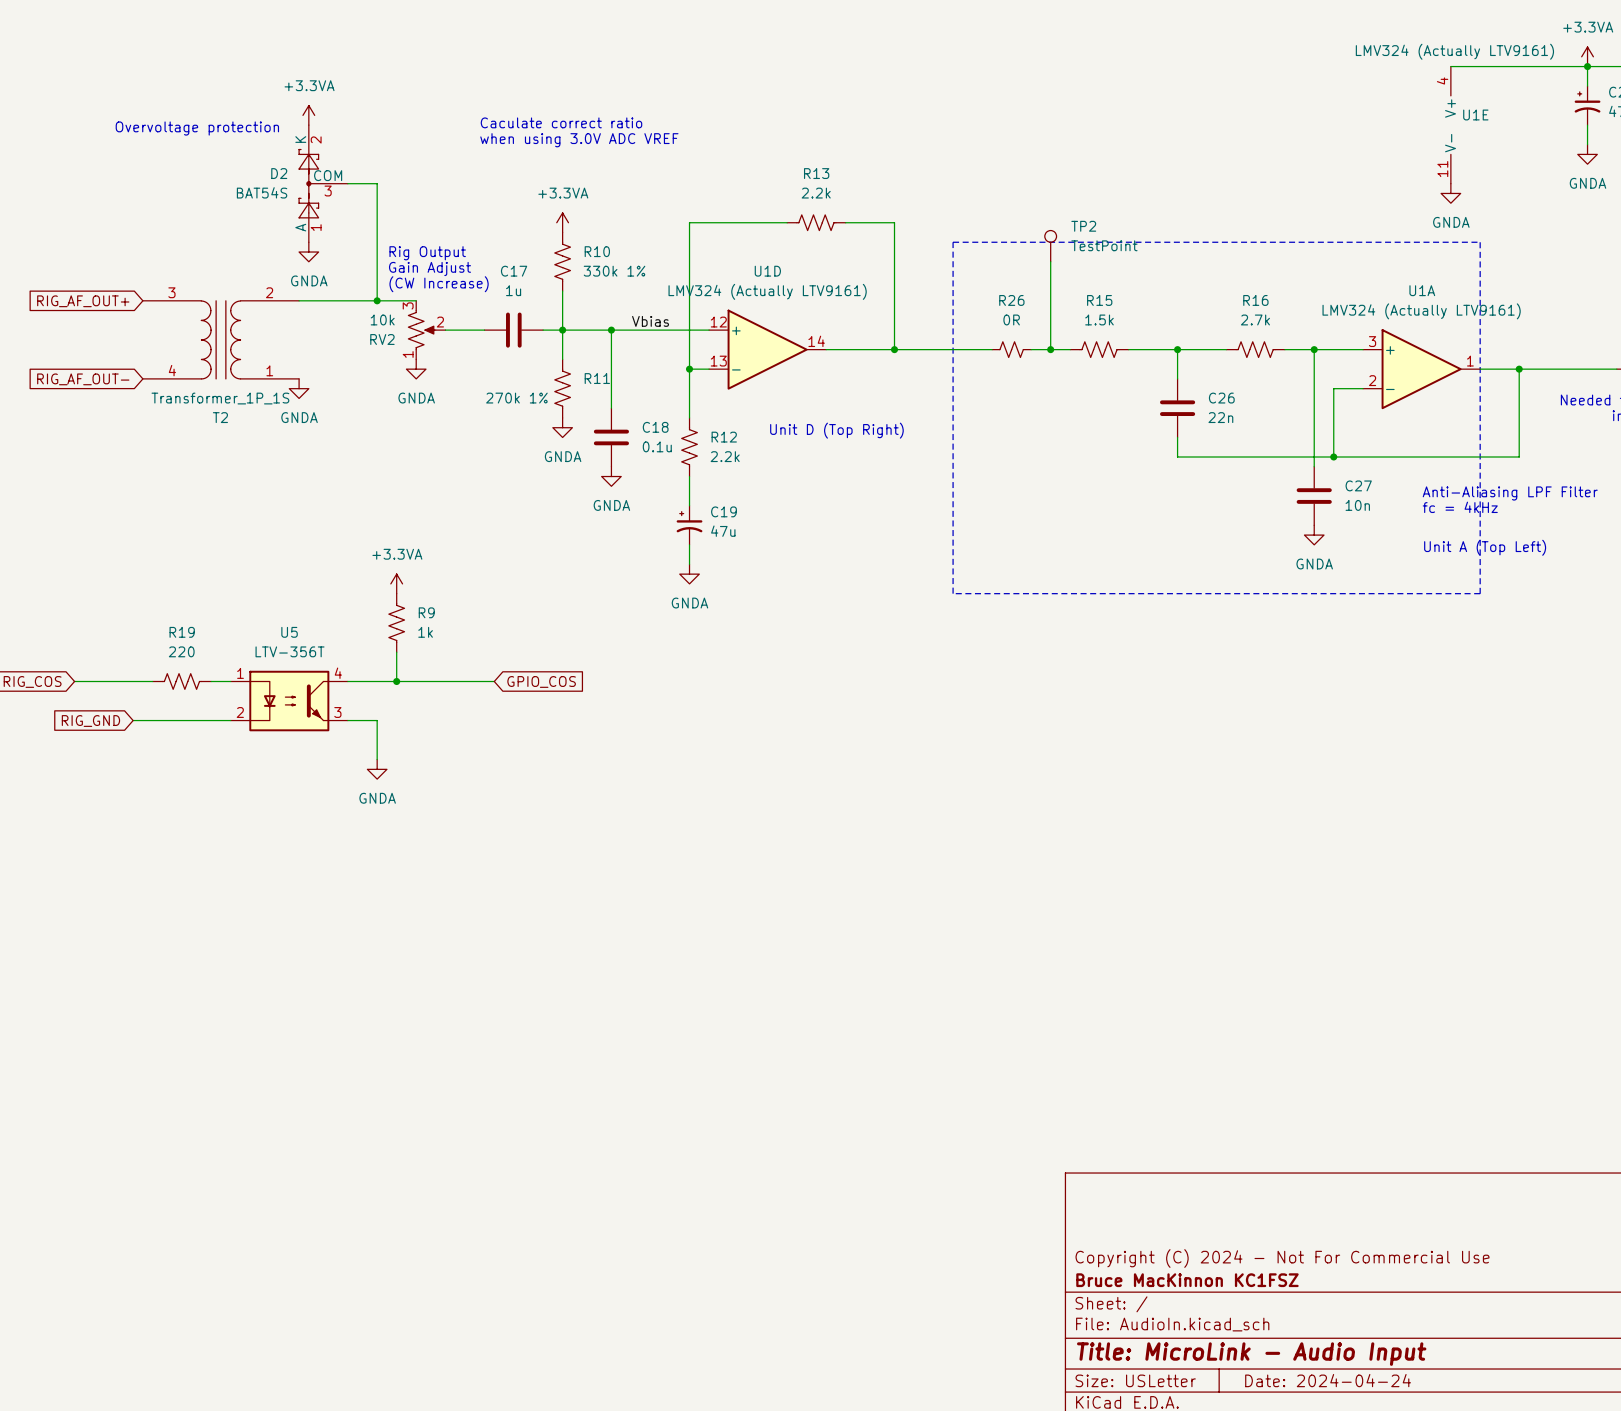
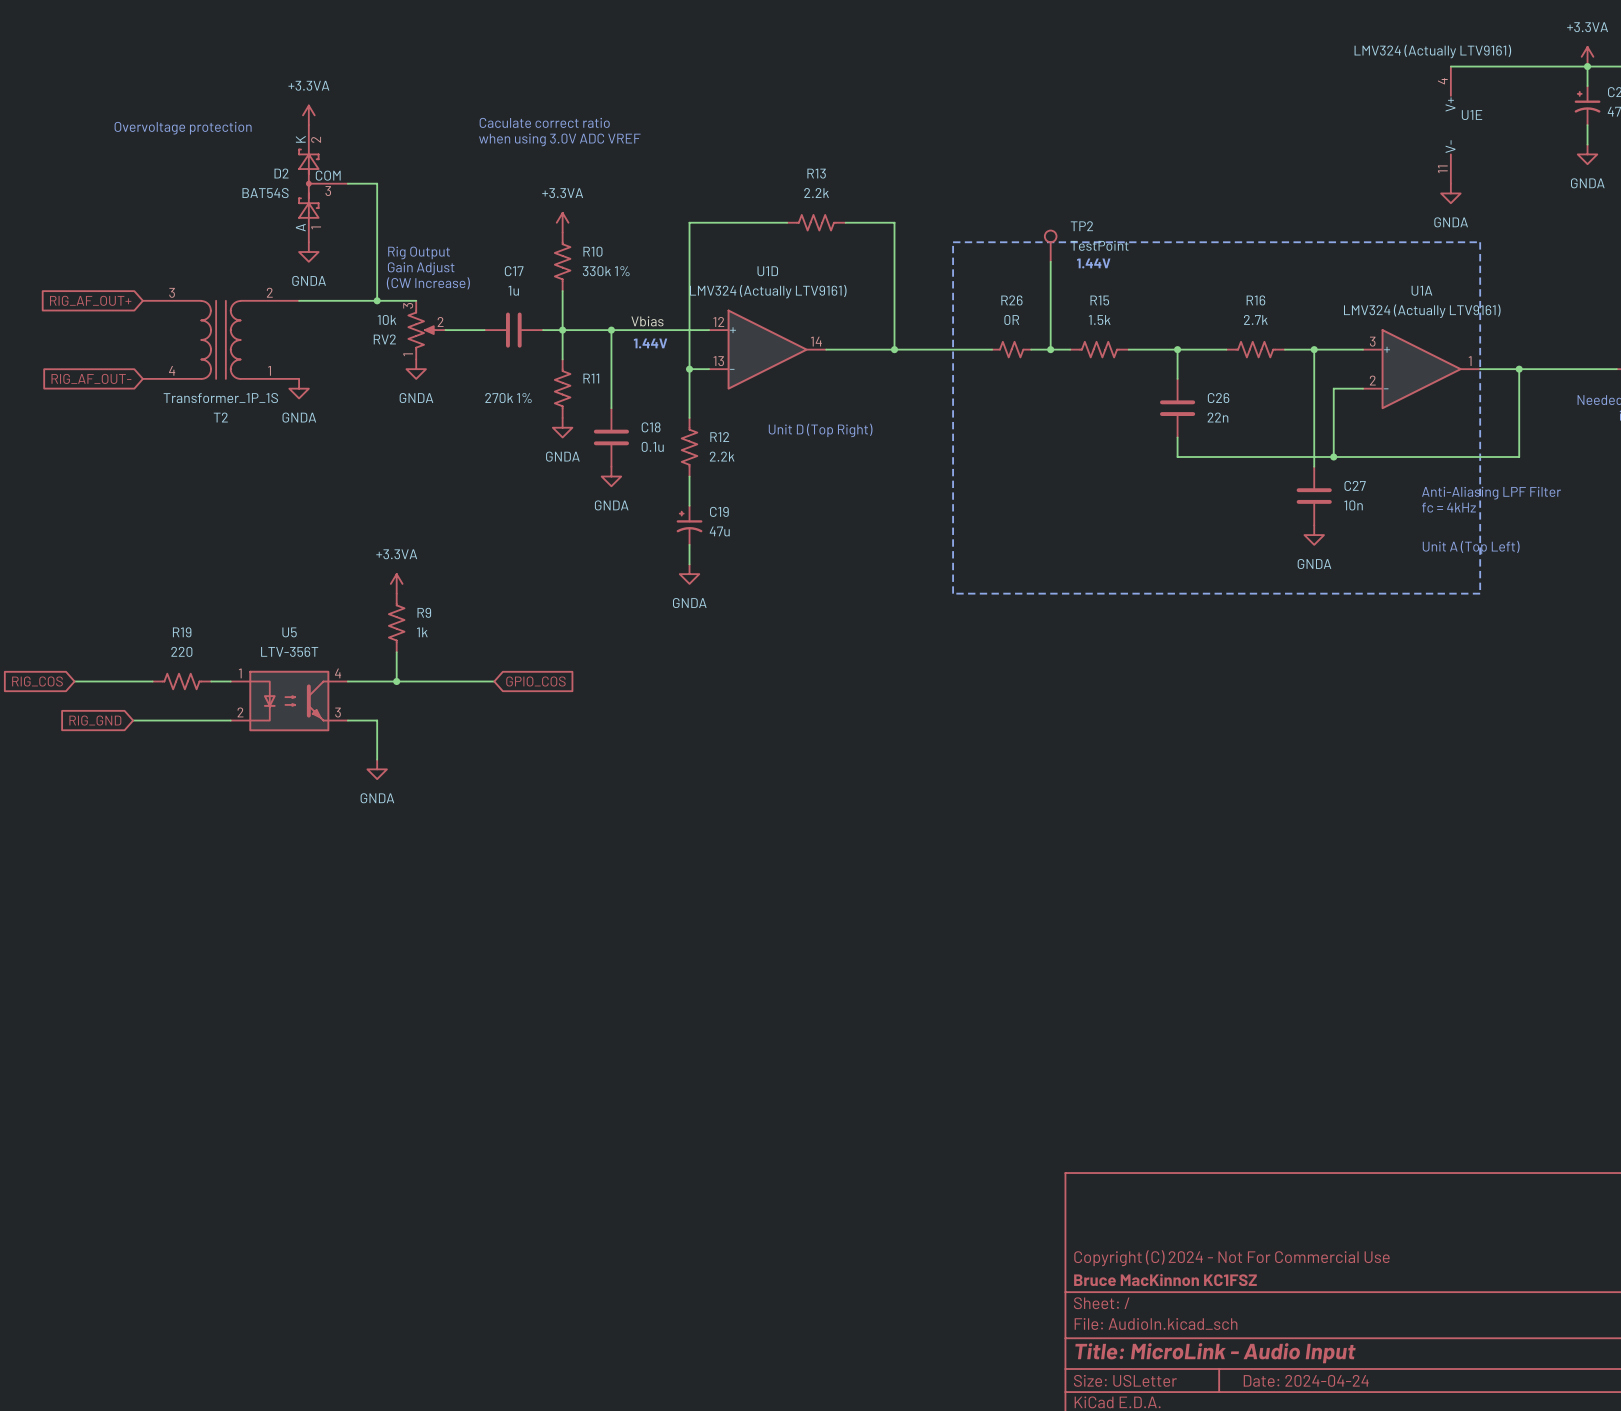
text: none -> 1.44V (1093, 263)
text: none -> 1.44V (650, 343)

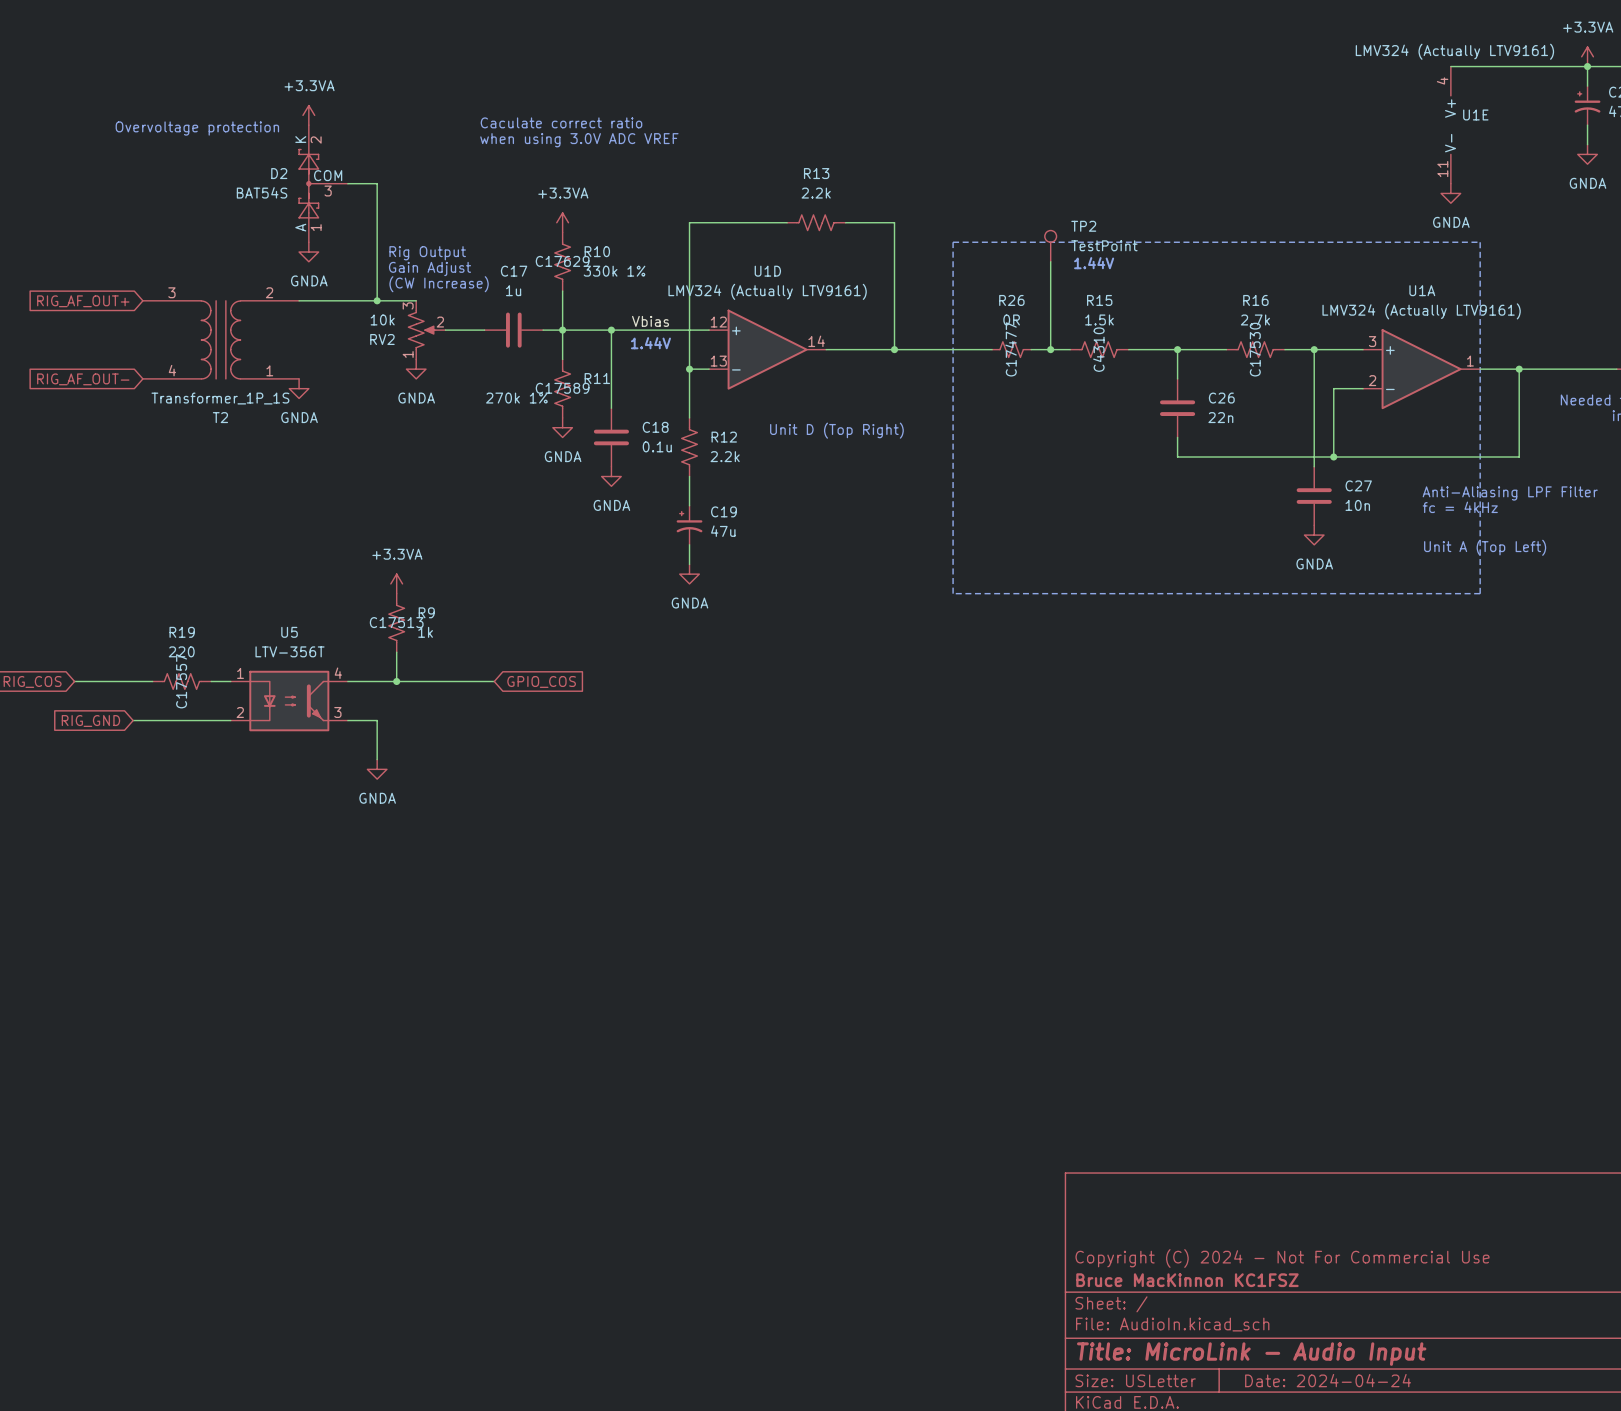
R10 text: none -> C17629 (562, 261)
R26 text: none -> C17477 (1011, 349)
R15 text: none -> C4310 (1098, 349)
R16 text: none -> C17530 (1255, 349)
R11 text: none -> C17589 (562, 388)
R9 text: none -> C17513 (396, 622)
R19 text: none -> C17557 (181, 681)

